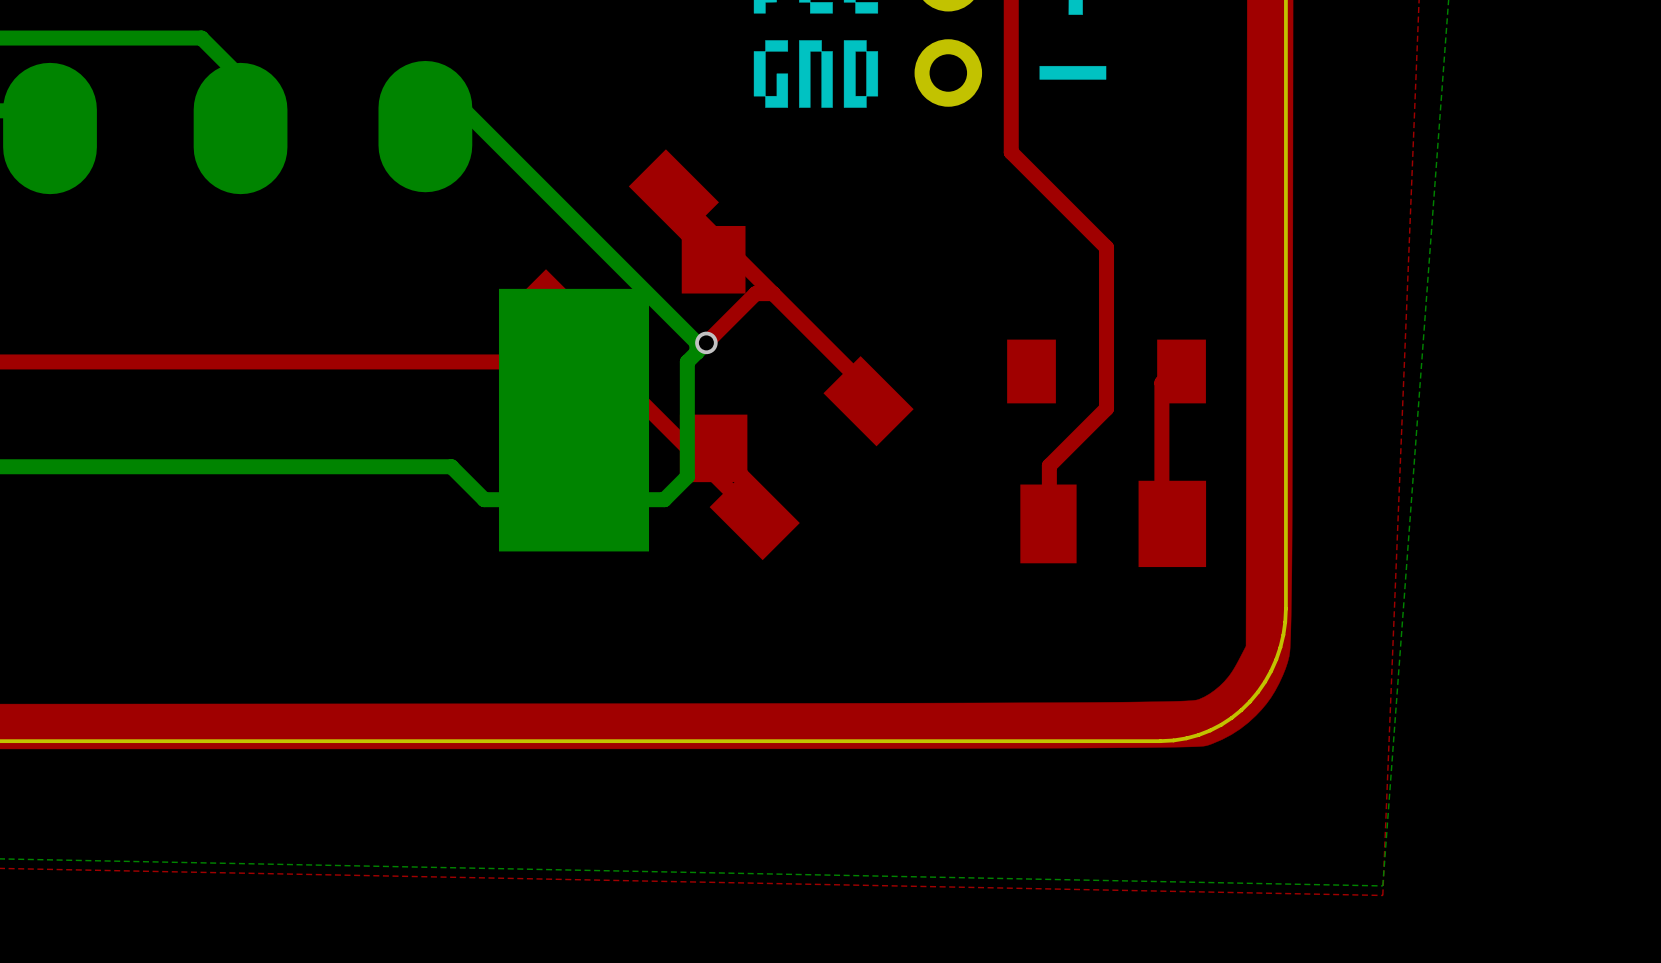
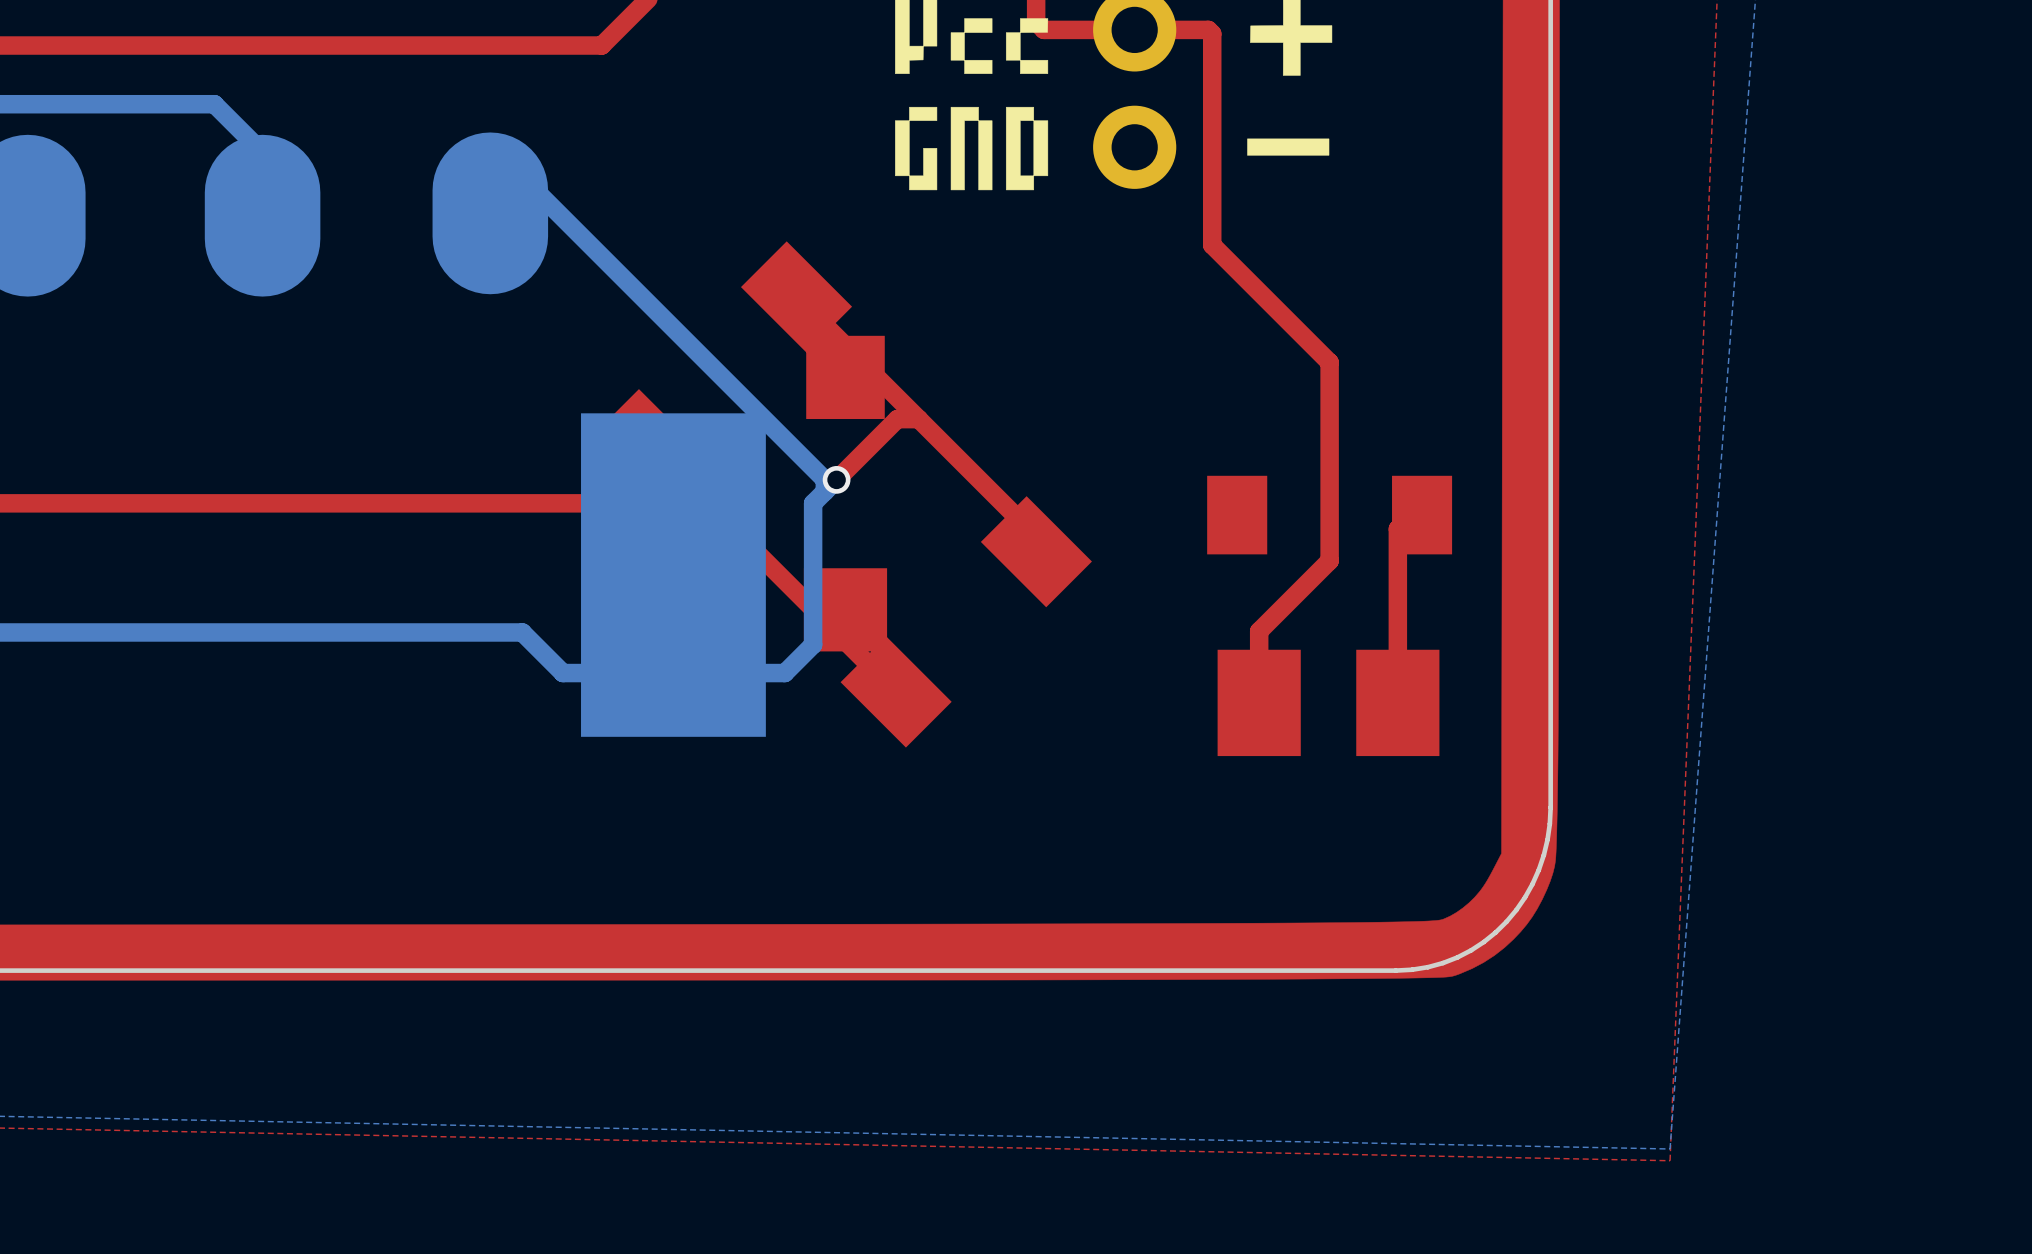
part footprint: [1020, 480, 1207, 568] -> [1217, 649, 1440, 757]

